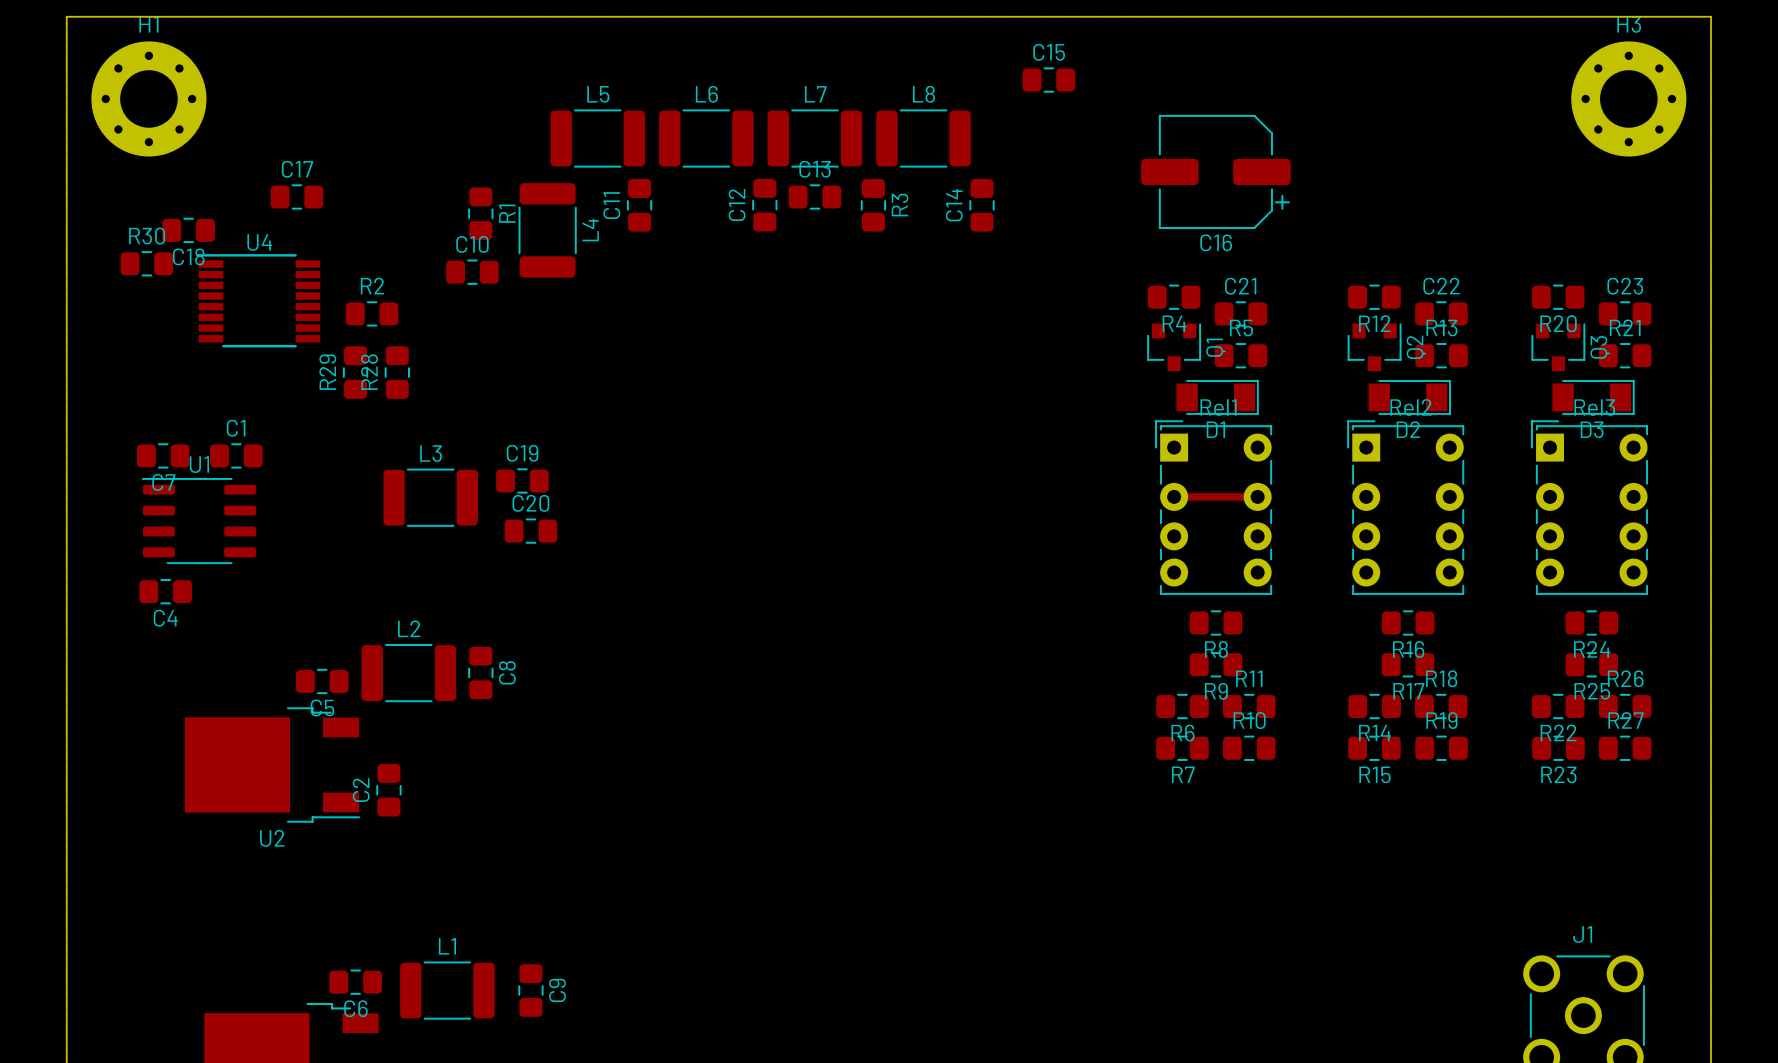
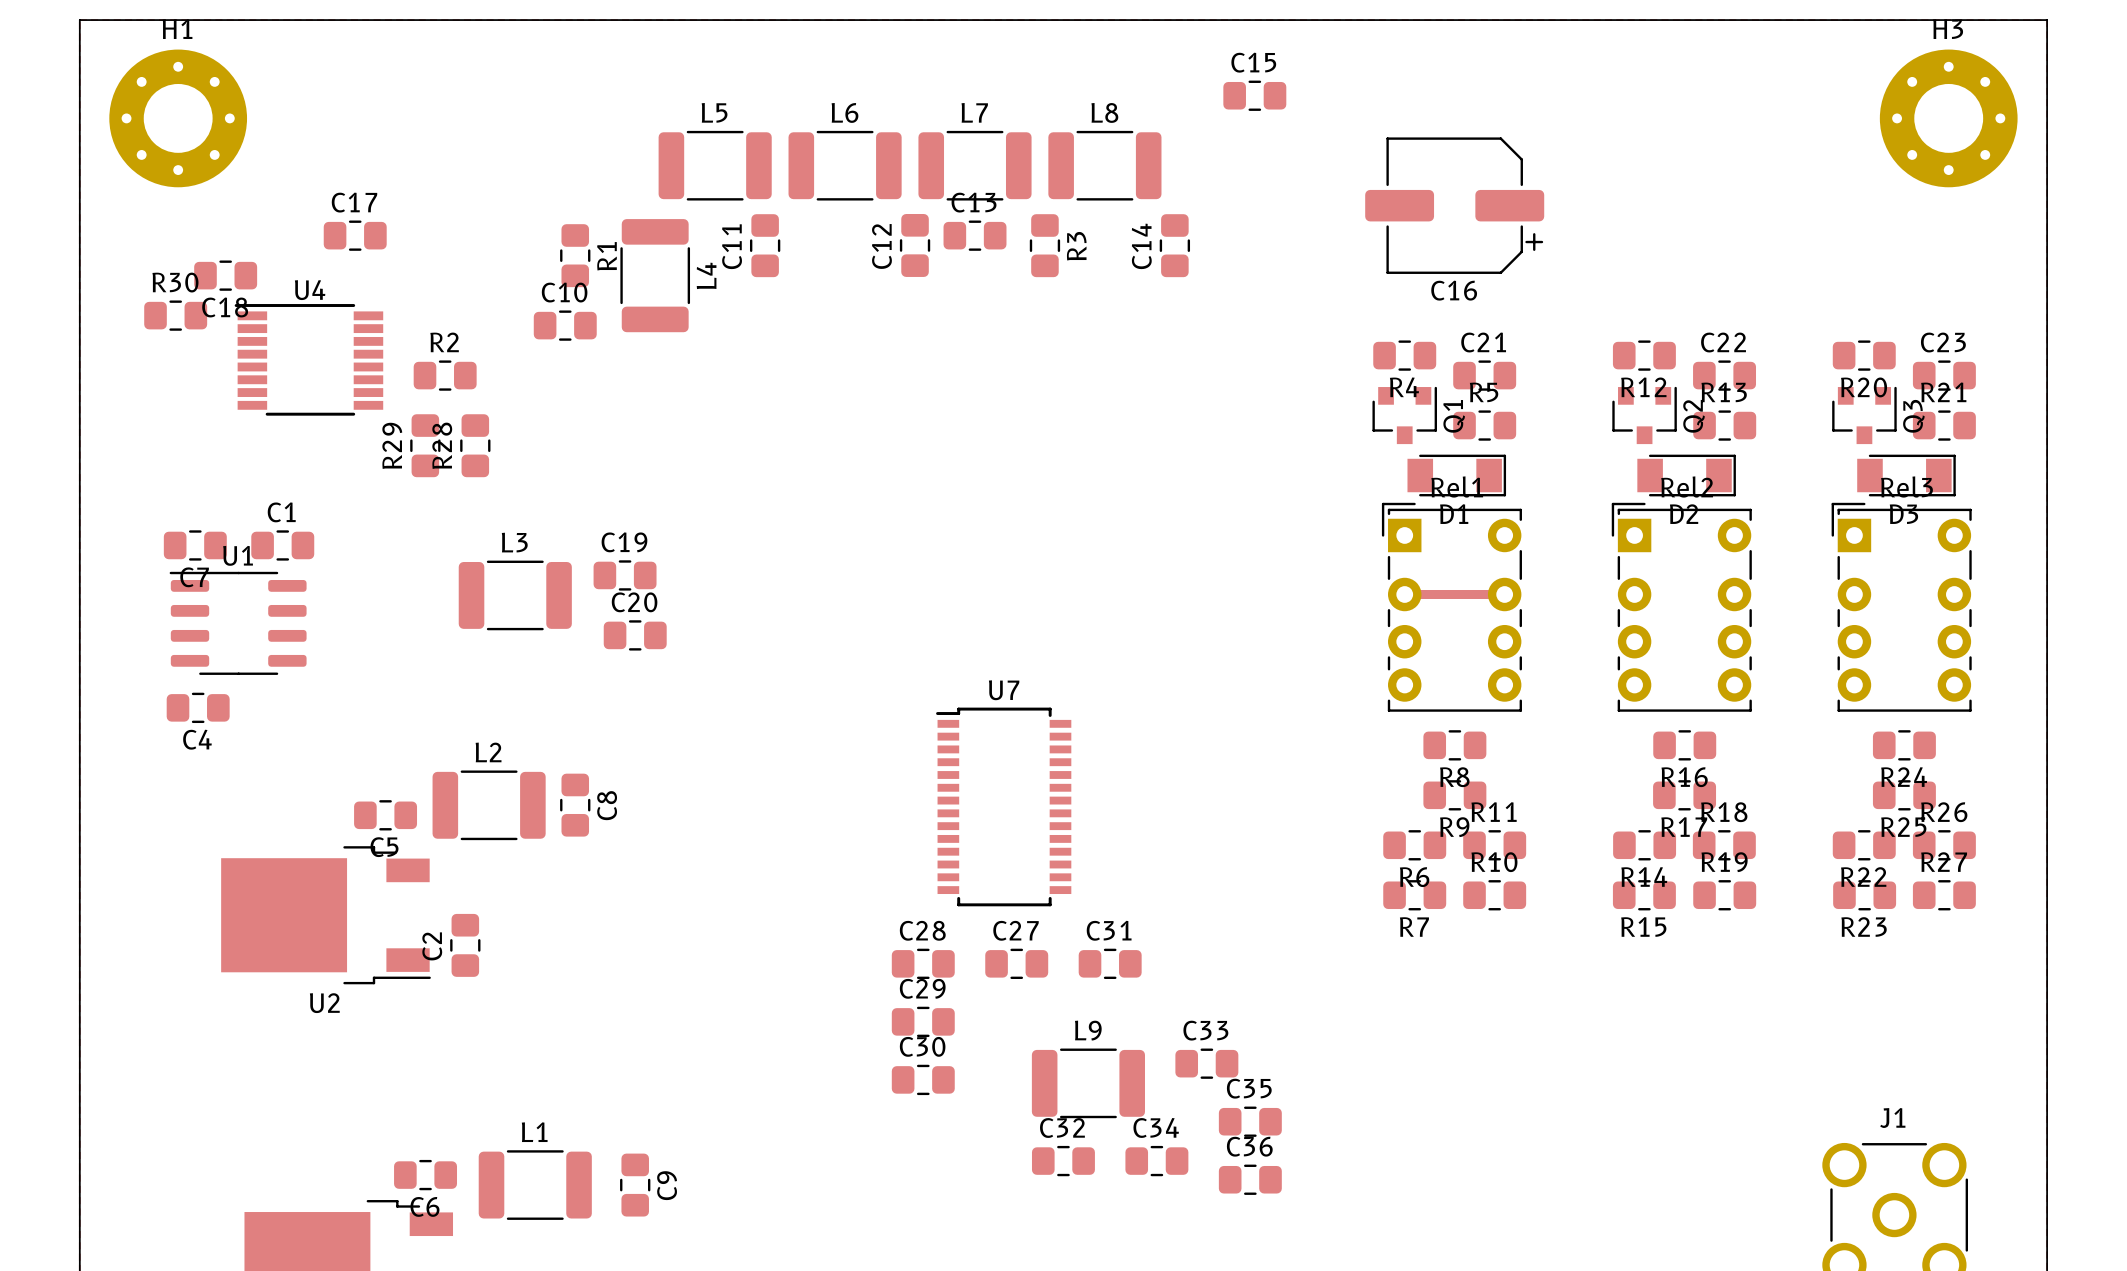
U7: none -> (1003, 806)
C28: none -> (923, 963)
C27: none -> (1016, 963)
C31: none -> (1110, 963)
C29: none -> (923, 1021)
C33: none -> (1206, 1063)
C30: none -> (923, 1079)
L9: none -> (1088, 1083)
C35: none -> (1250, 1121)
C32: none -> (1063, 1161)
C34: none -> (1156, 1161)
C36: none -> (1250, 1179)

